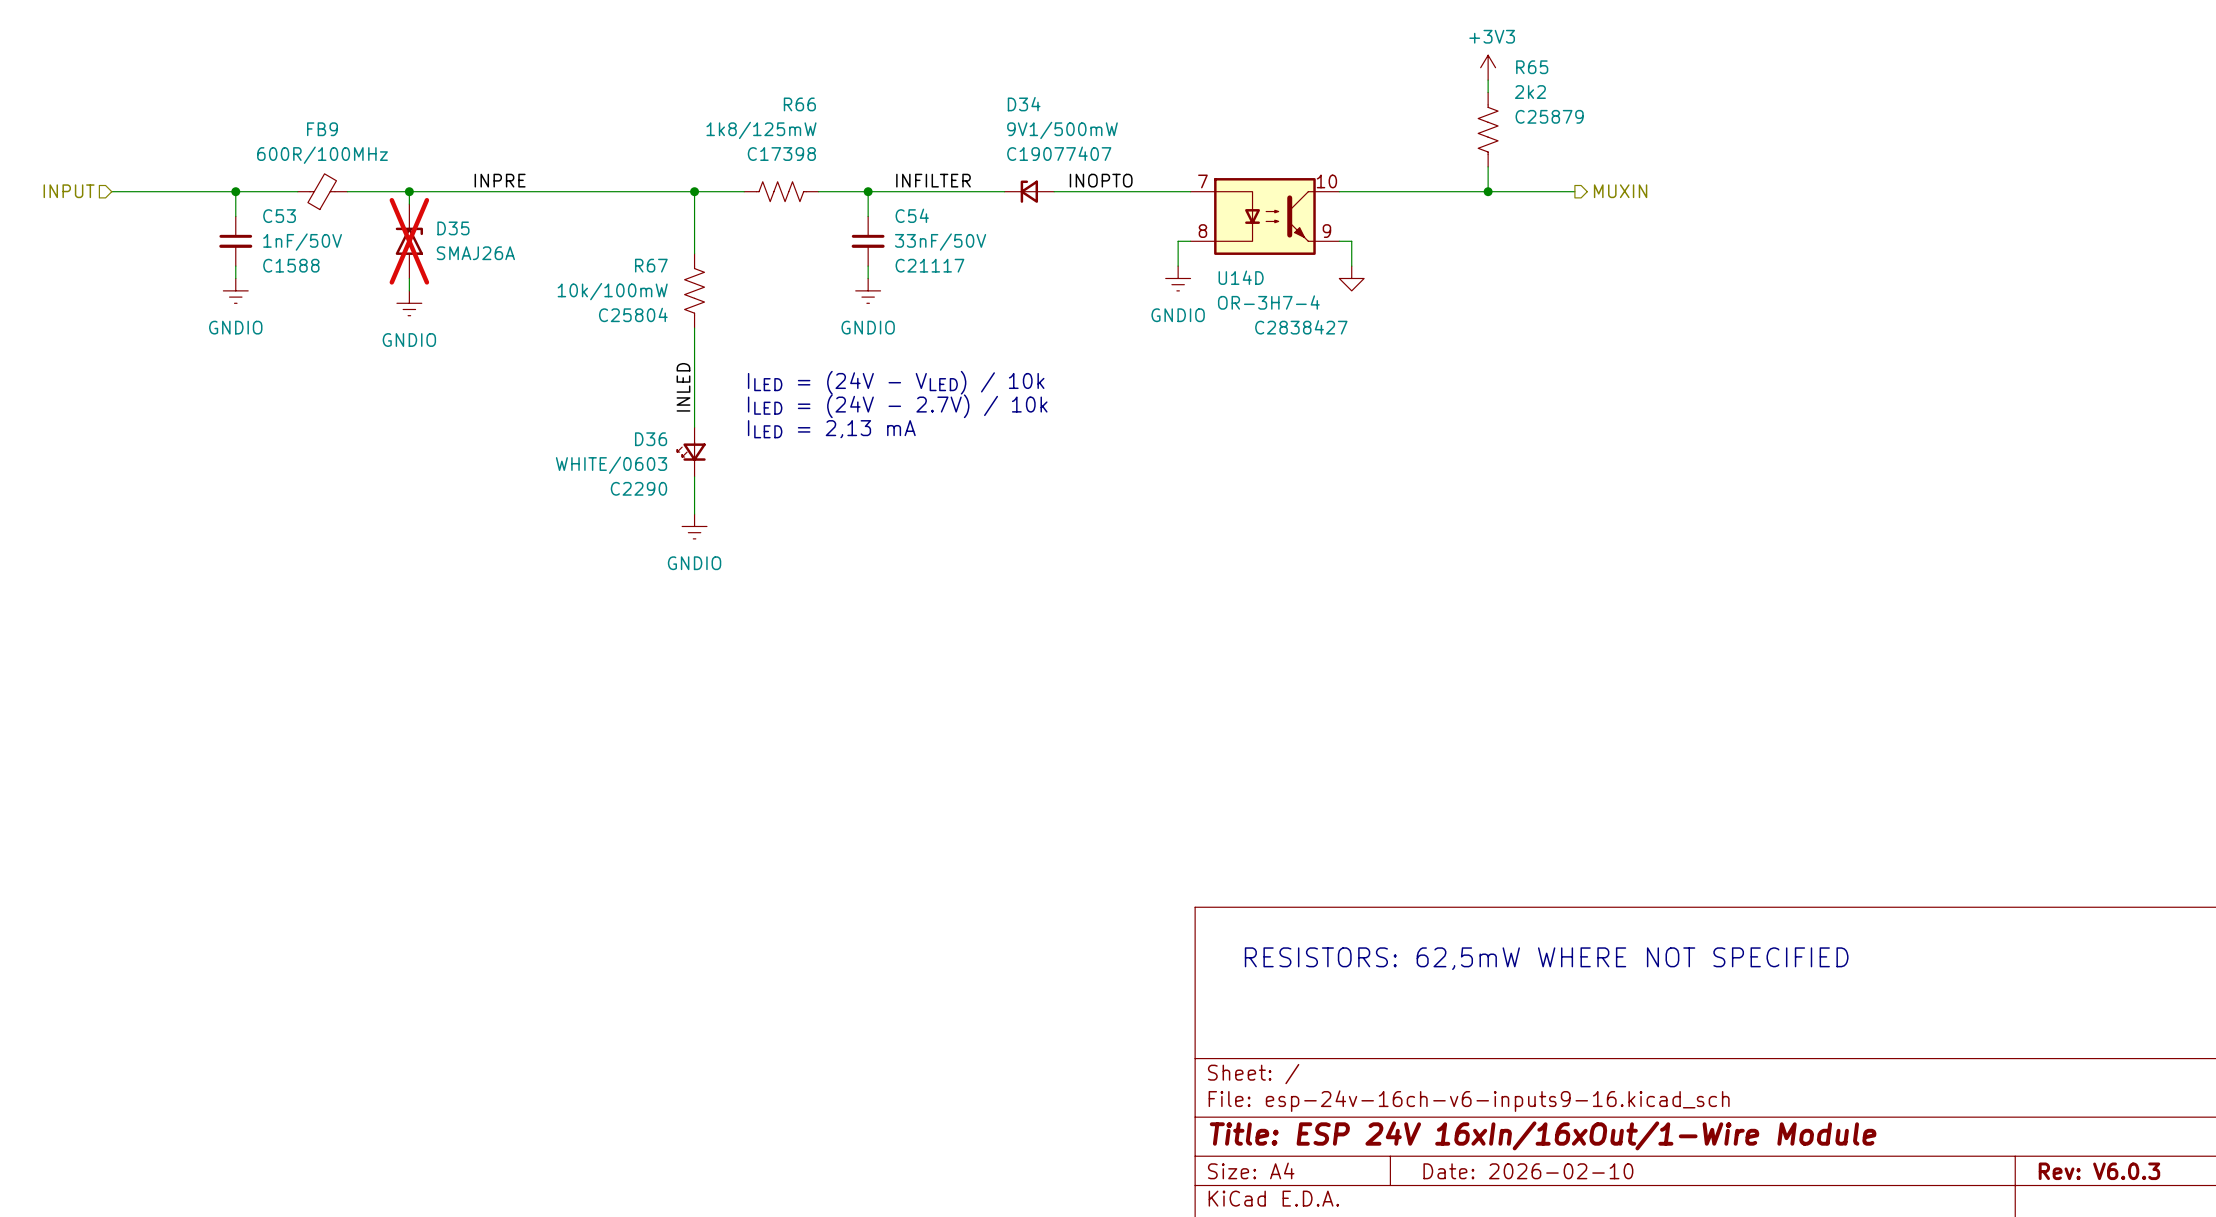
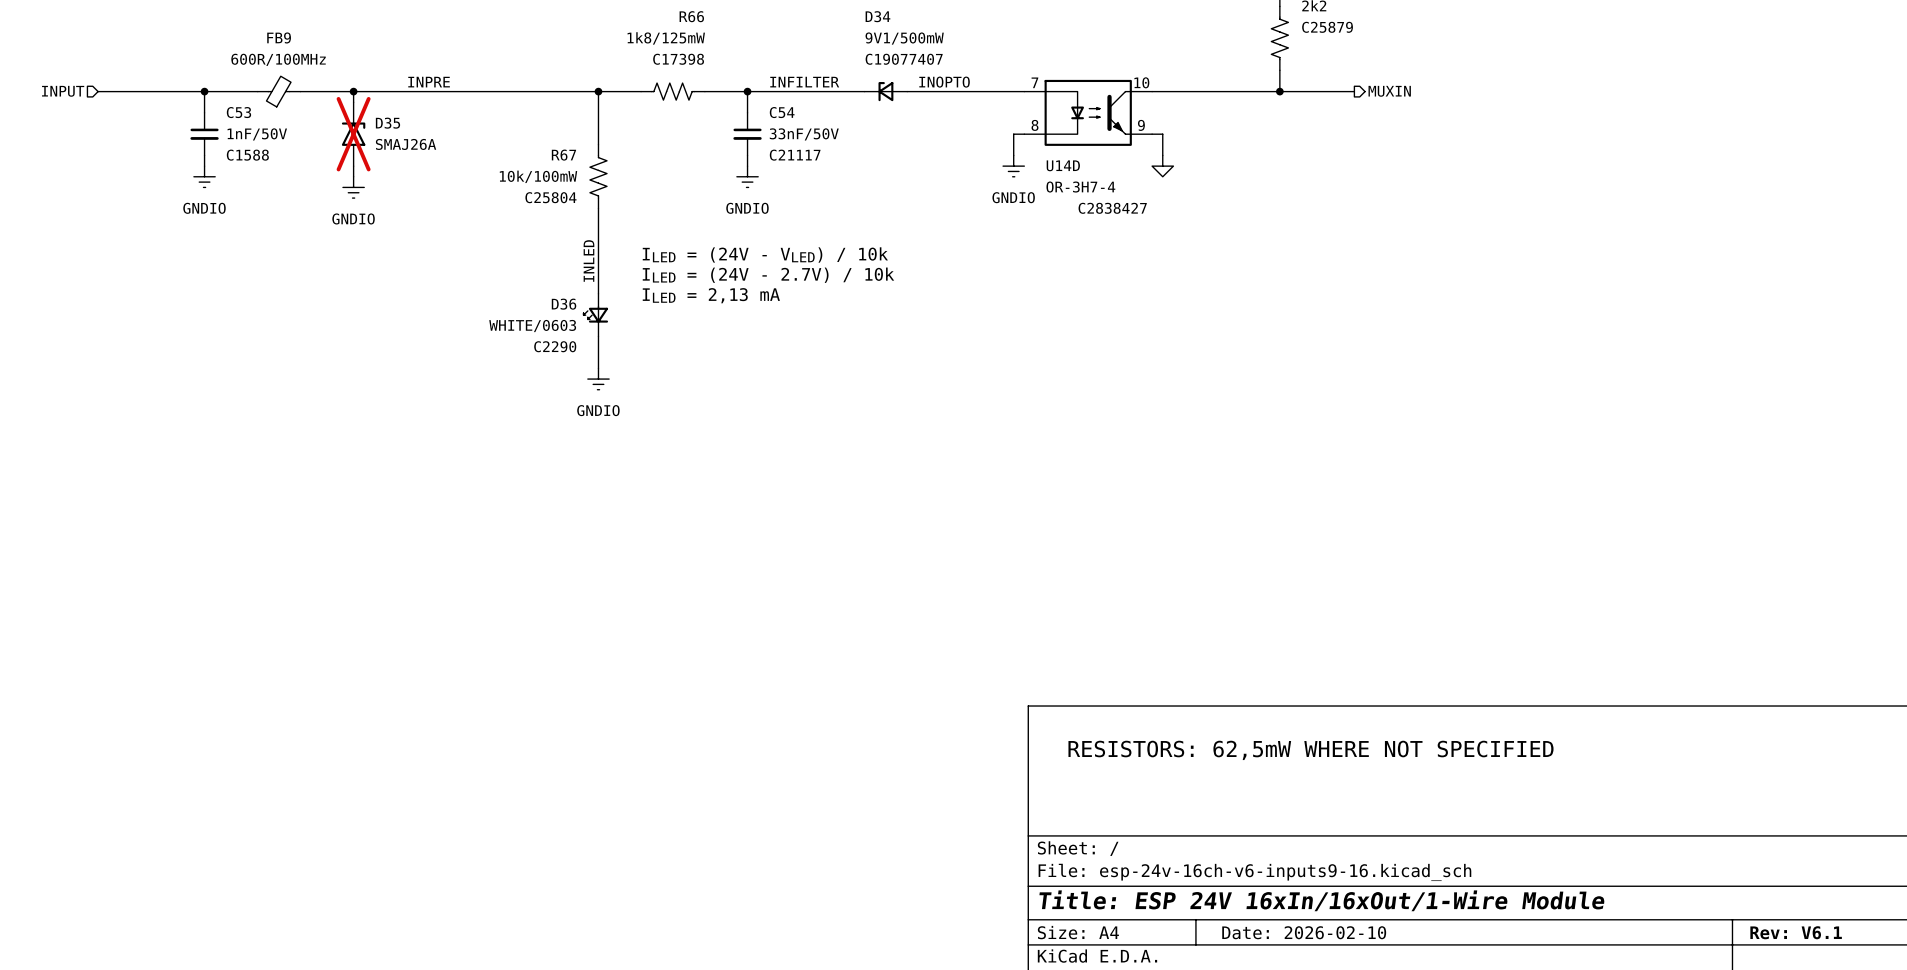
title block: Rev: V6.0.3 (2099, 1171) -> Rev: V6.1 (1796, 932)

